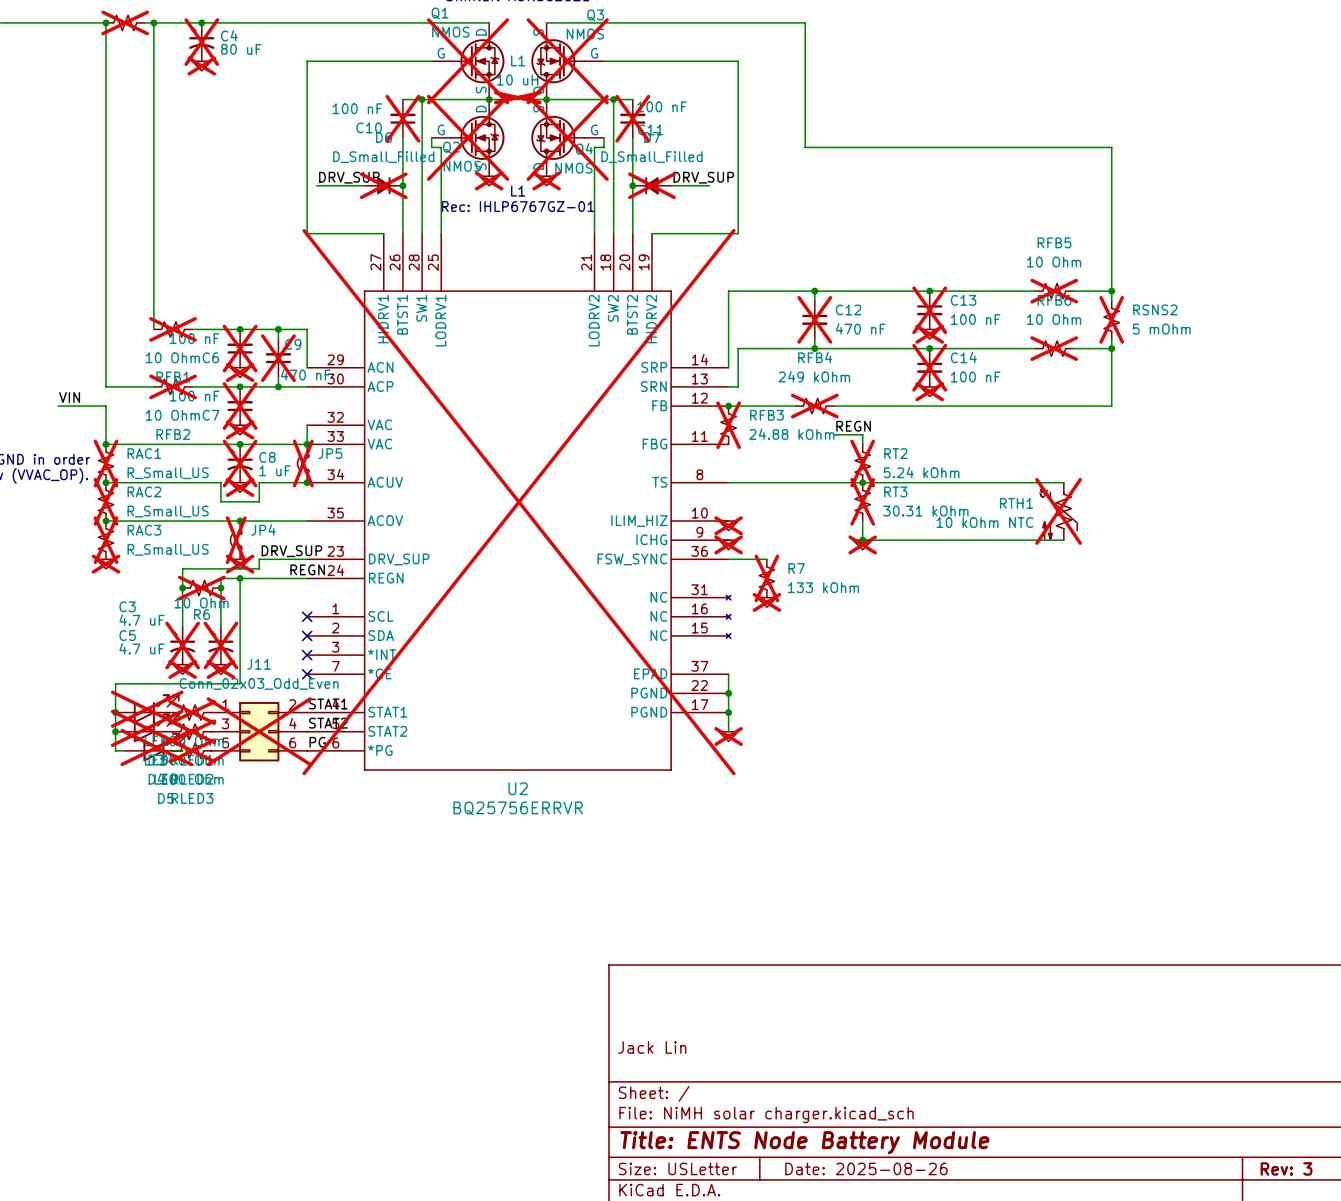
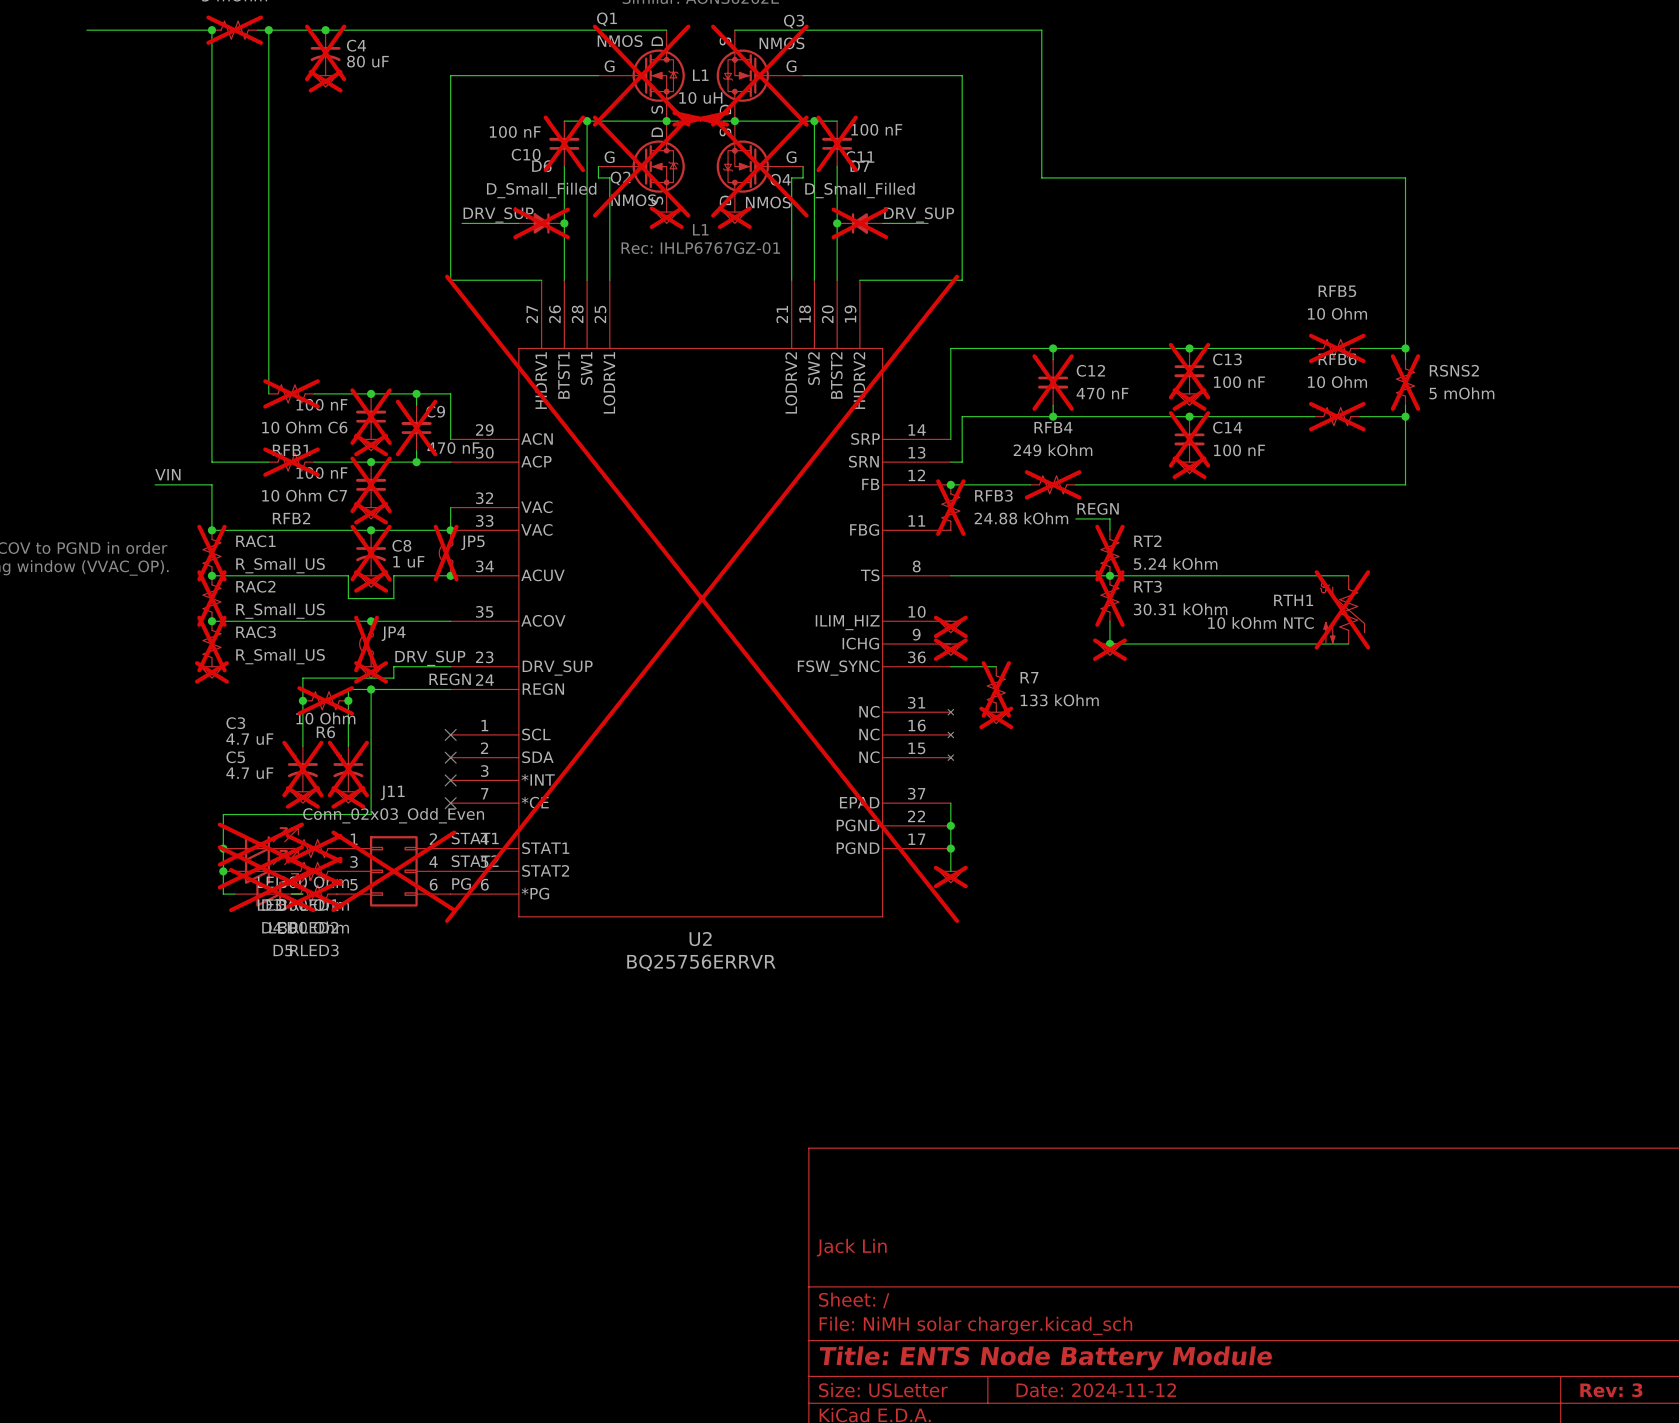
title block: Date: 2025-08-26 (866, 1168) -> Date: 2024-11-12 (1096, 1390)

